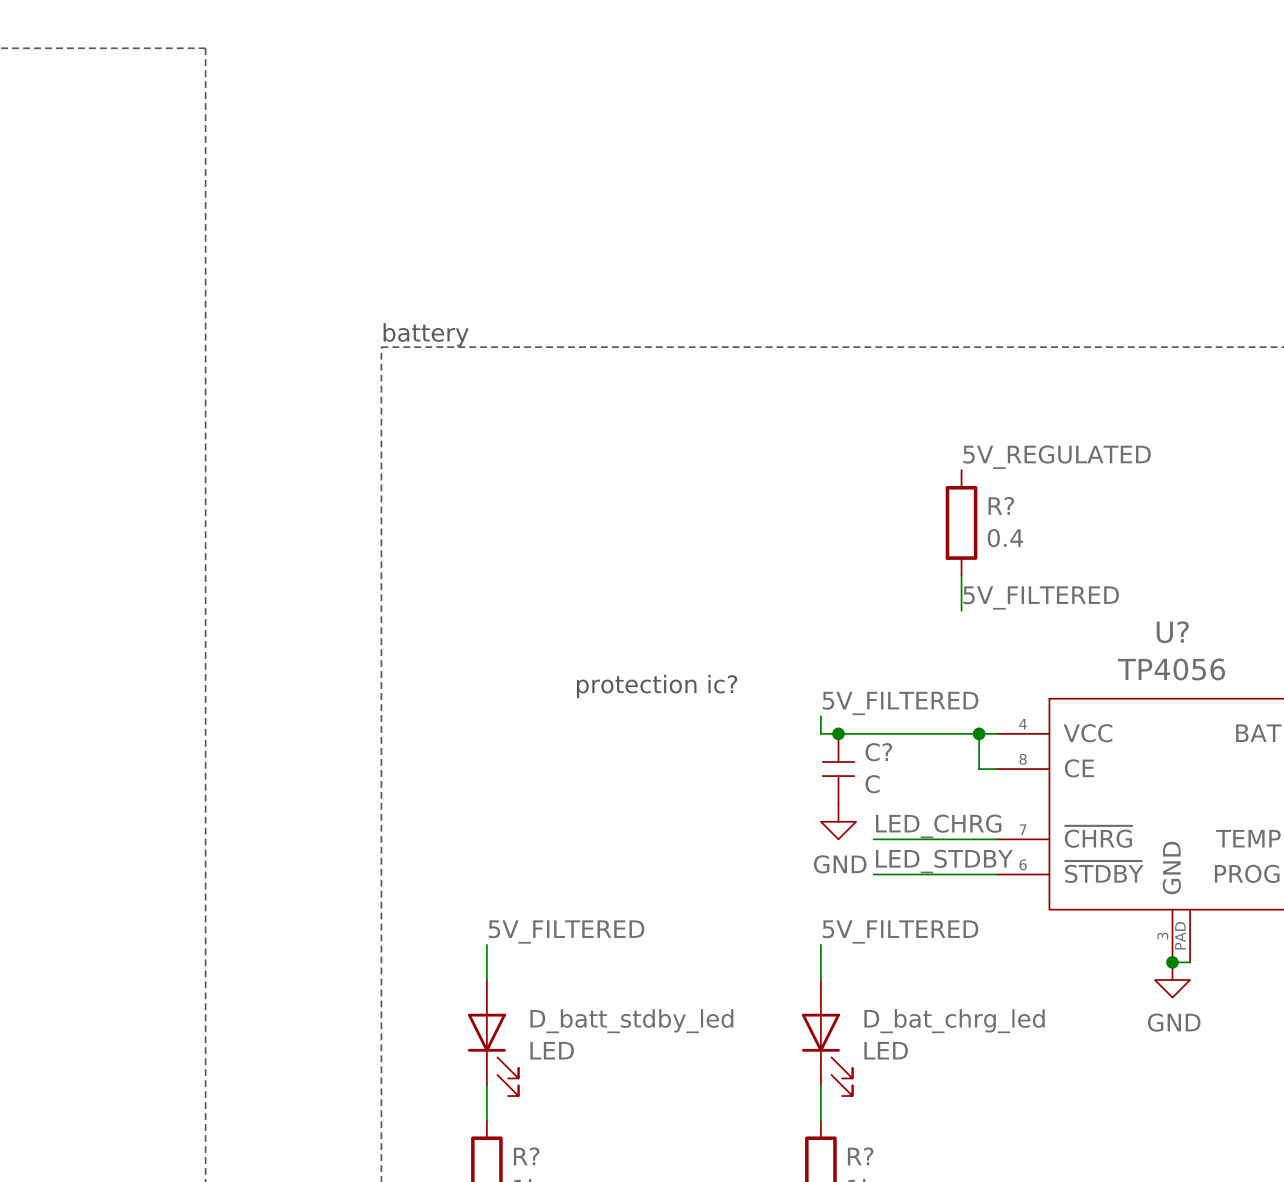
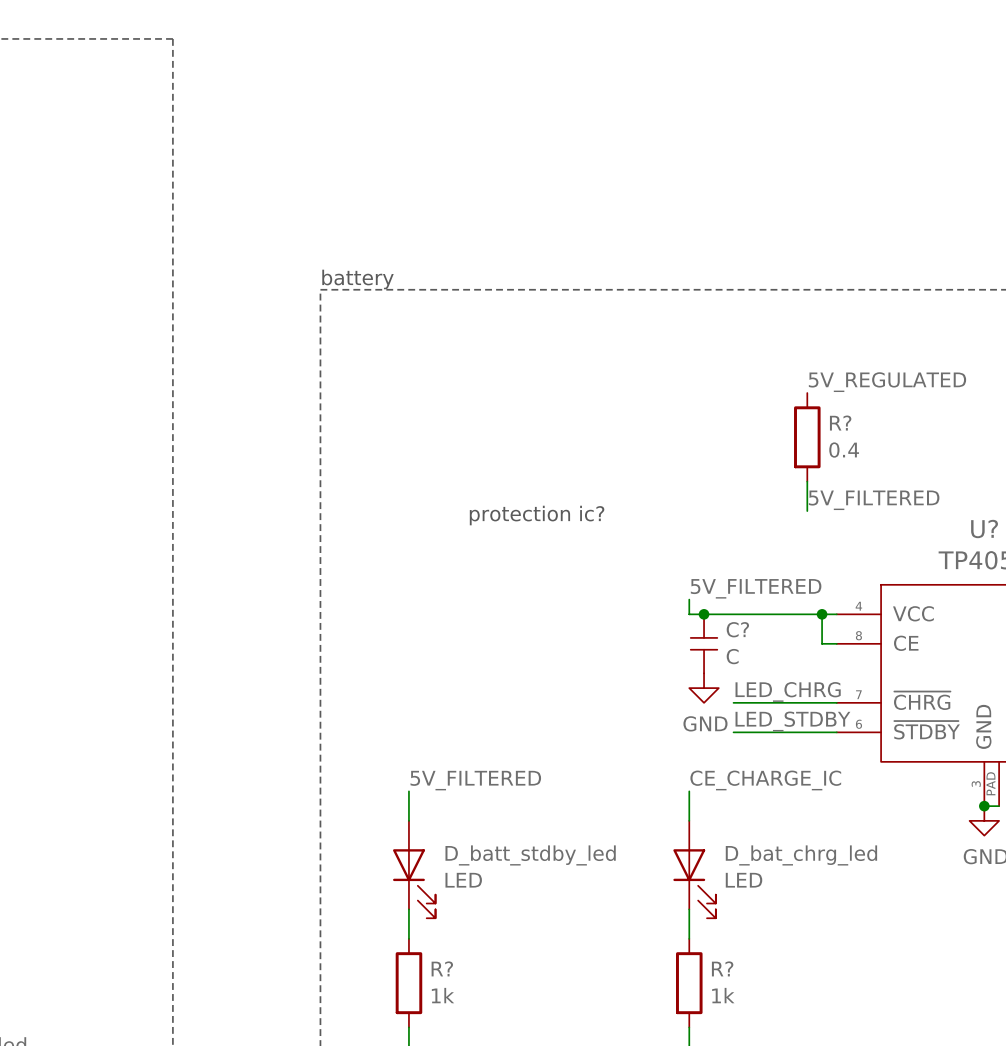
text position: protection ic? (657, 686) -> protection ic? (537, 515)
label: 5V_FILTERED (900, 931) -> CE_CHARGE_IC (765, 780)

